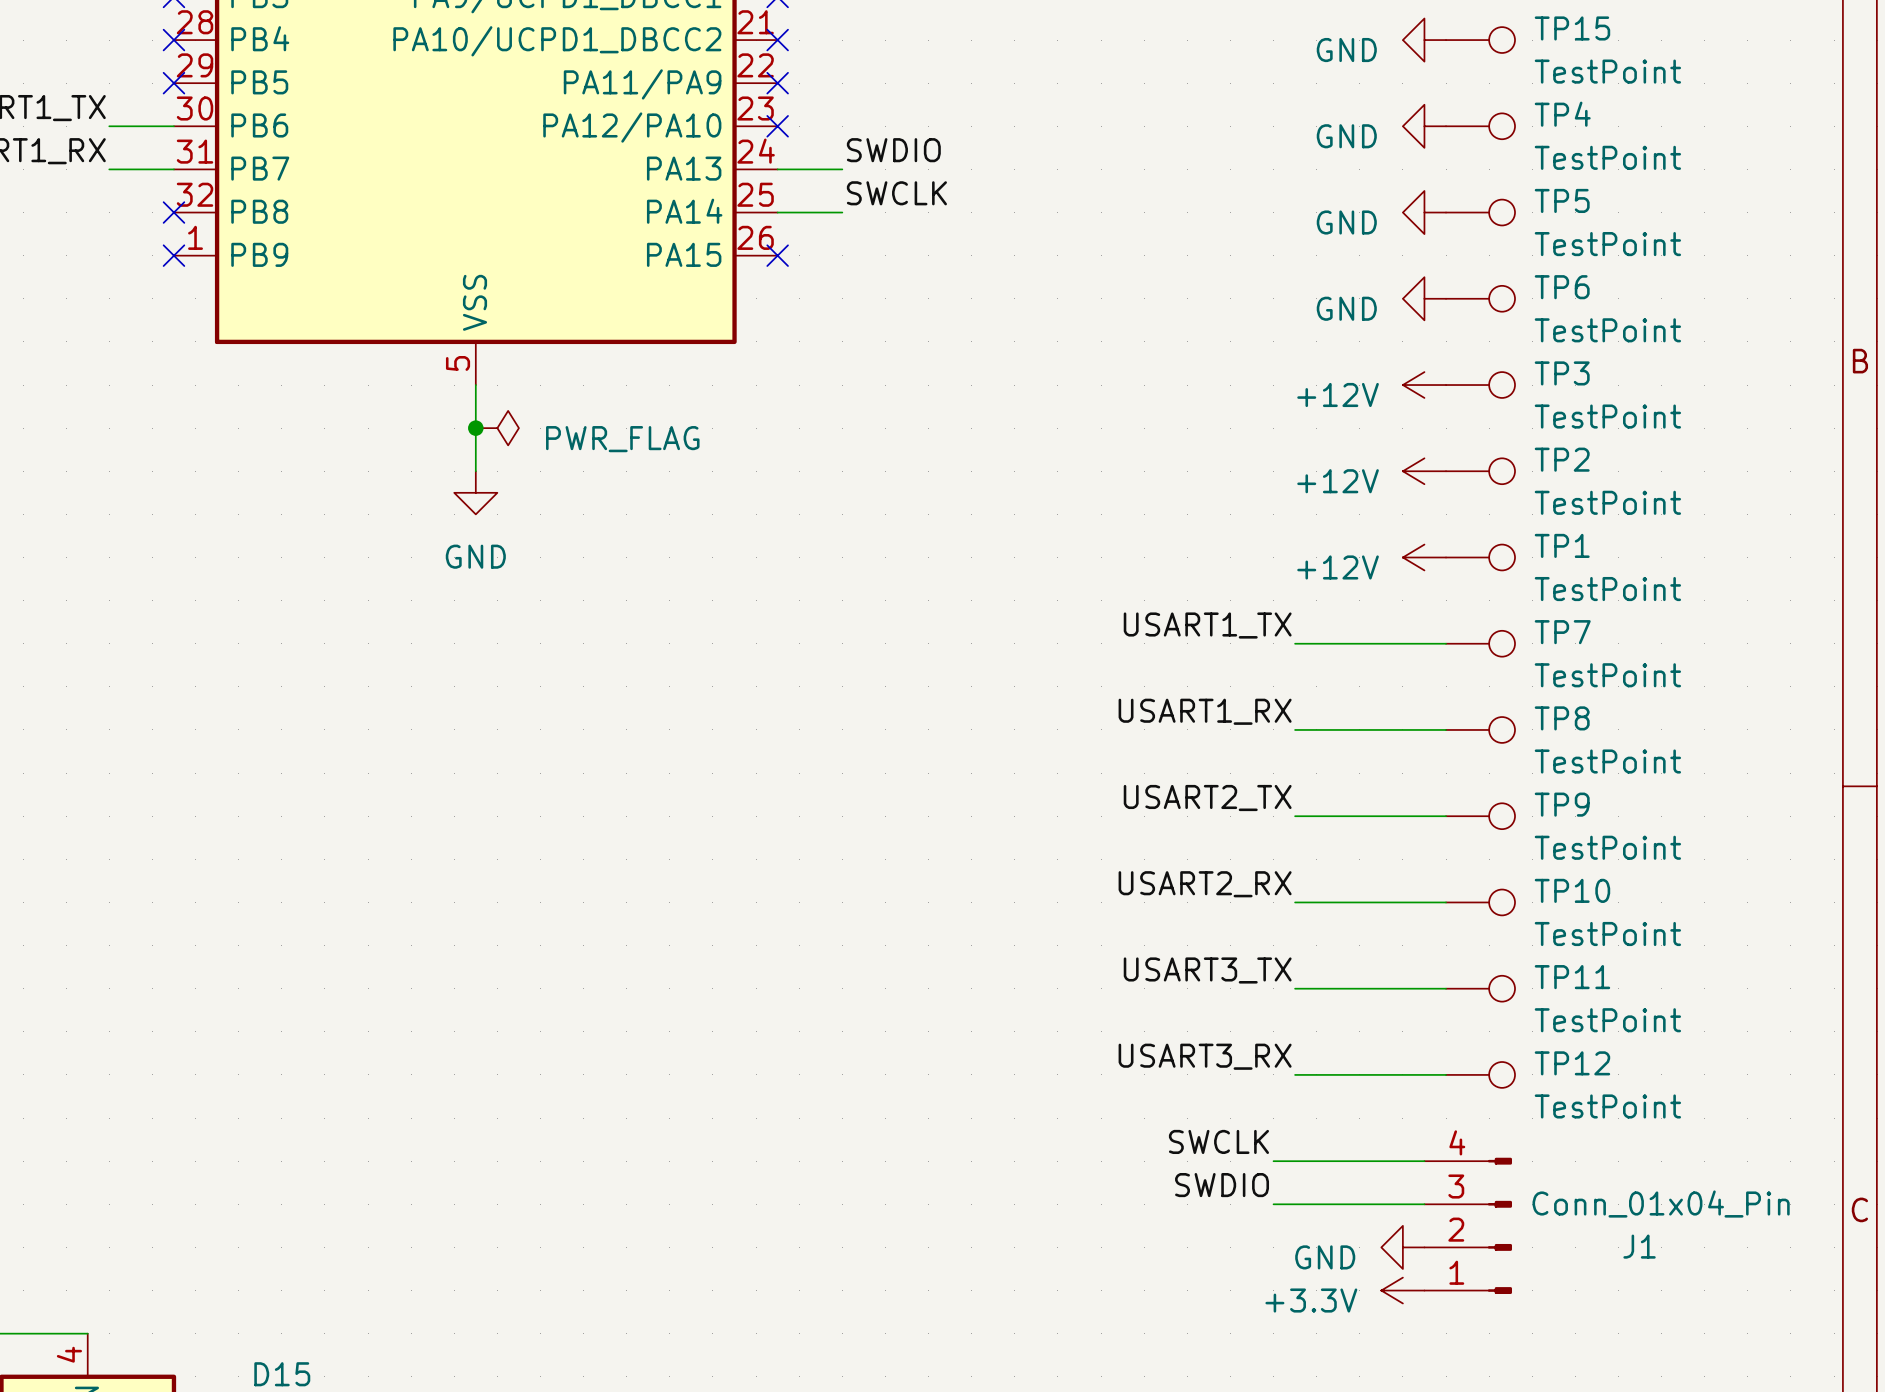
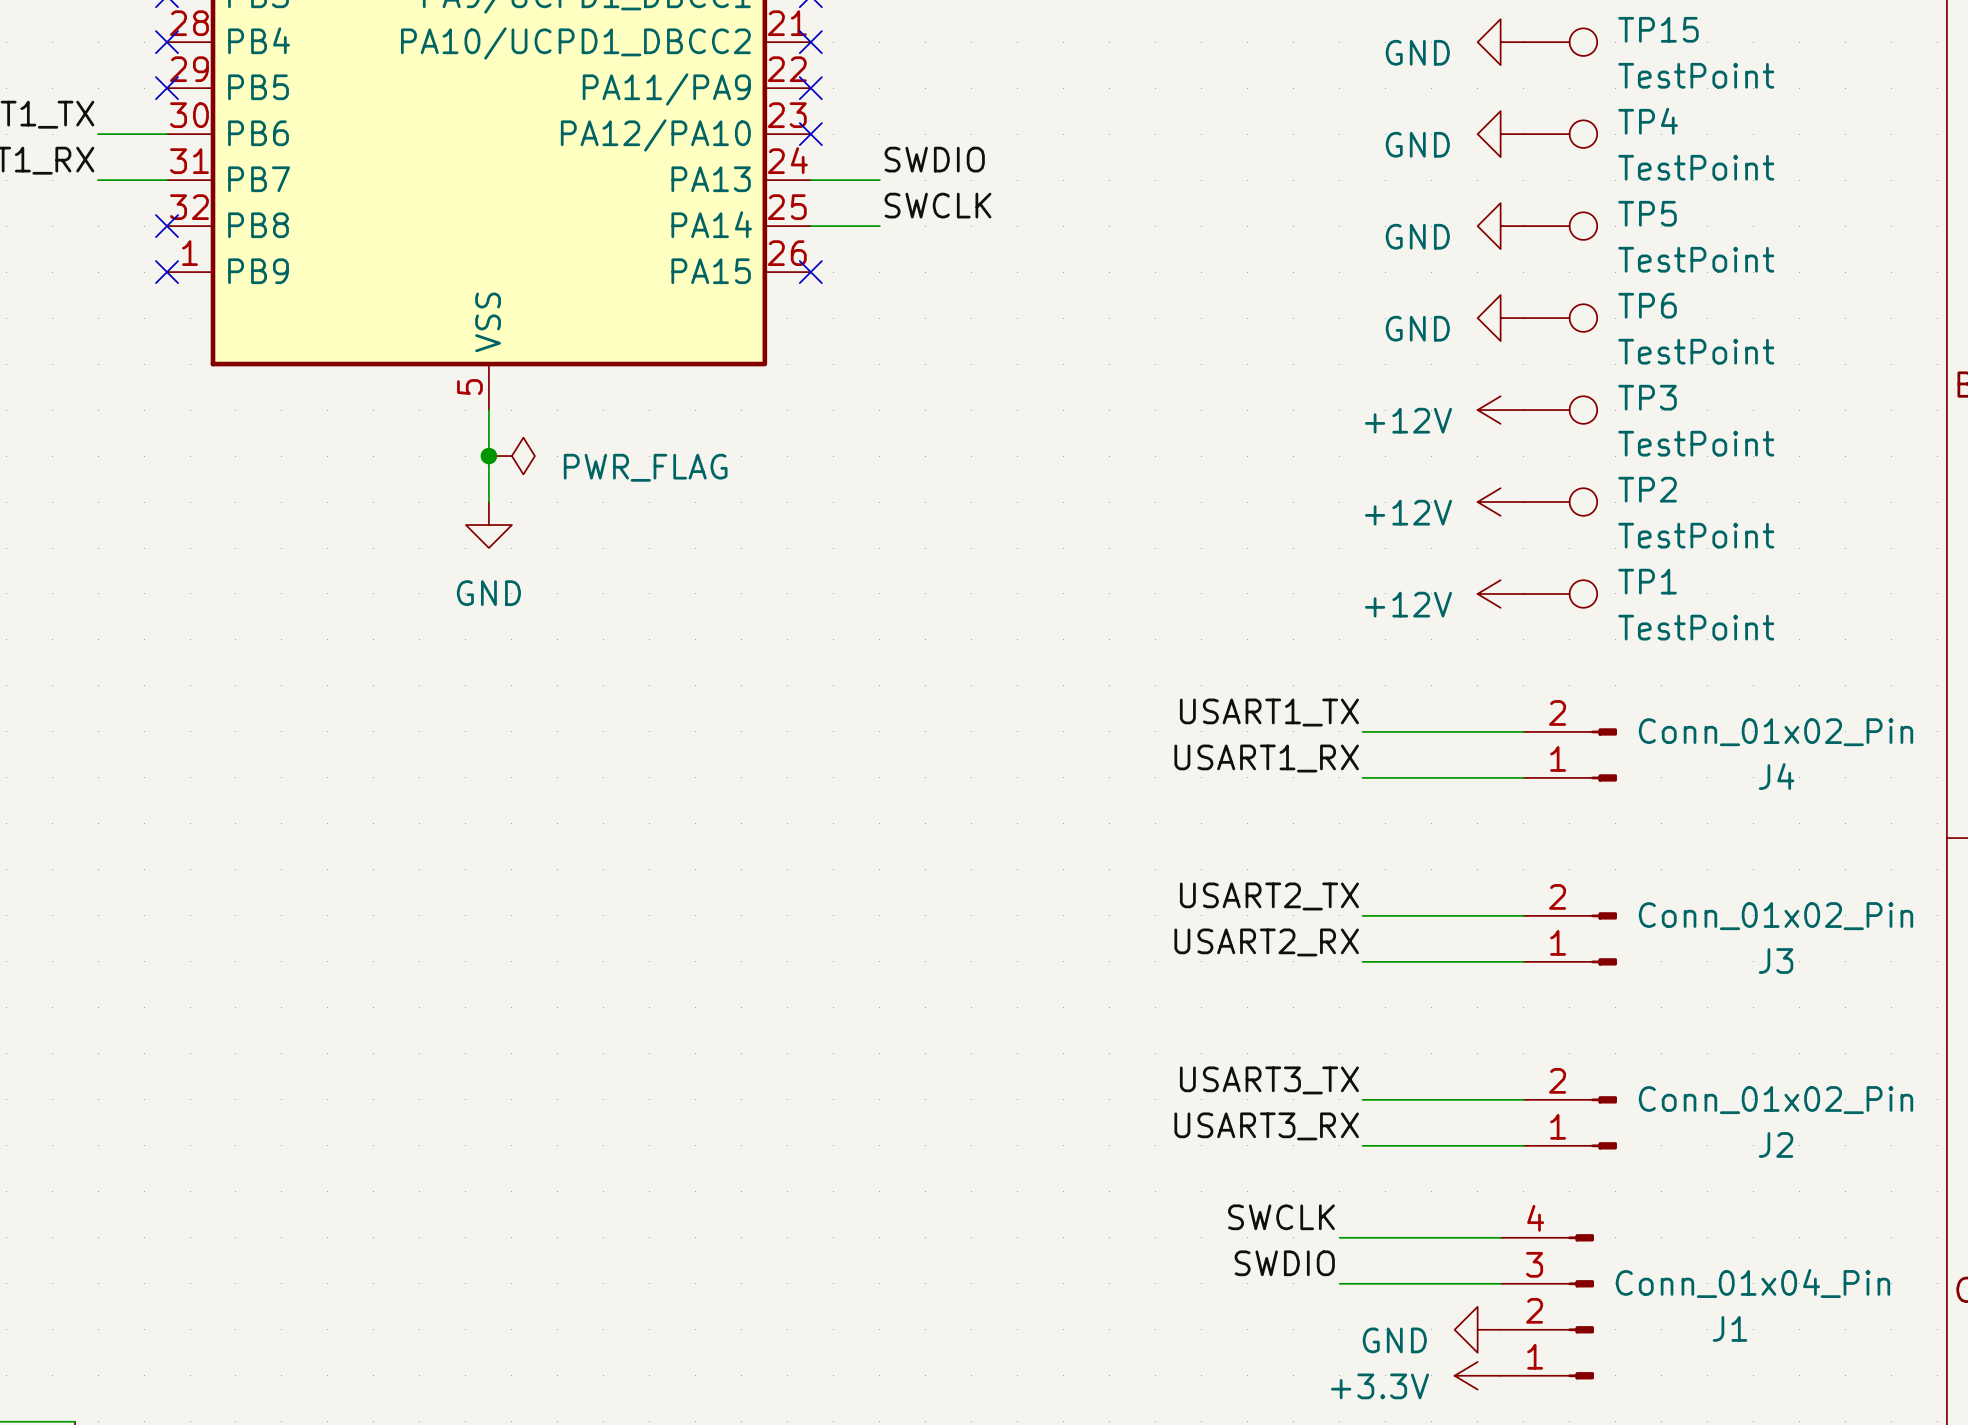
label position: USART1_TX (1207, 625) -> USART1_TX (1269, 712)
wire: (1295, 643) (1446, 643) -> (1362, 731) (1523, 731)
TP7: TestPoint (1480, 643) -> none
J4: none -> Conn_01x02_Pin (1570, 754)
TP8: TestPoint (1480, 729) -> none
label position: USART2_TX (1207, 798) -> USART2_TX (1269, 896)
wire: (1295, 816) (1446, 816) -> (1362, 915) (1523, 915)
TP9: TestPoint (1480, 816) -> none
J3: none -> Conn_01x02_Pin (1570, 938)
TP10: TestPoint (1480, 902) -> none
label position: USART3_TX (1207, 970) -> USART3_TX (1269, 1080)
wire: (1295, 988) (1446, 988) -> (1362, 1099) (1523, 1099)
TP11: TestPoint (1480, 988) -> none
J2: none -> Conn_01x02_Pin (1570, 1122)
TP12: TestPoint (1480, 1074) -> none

